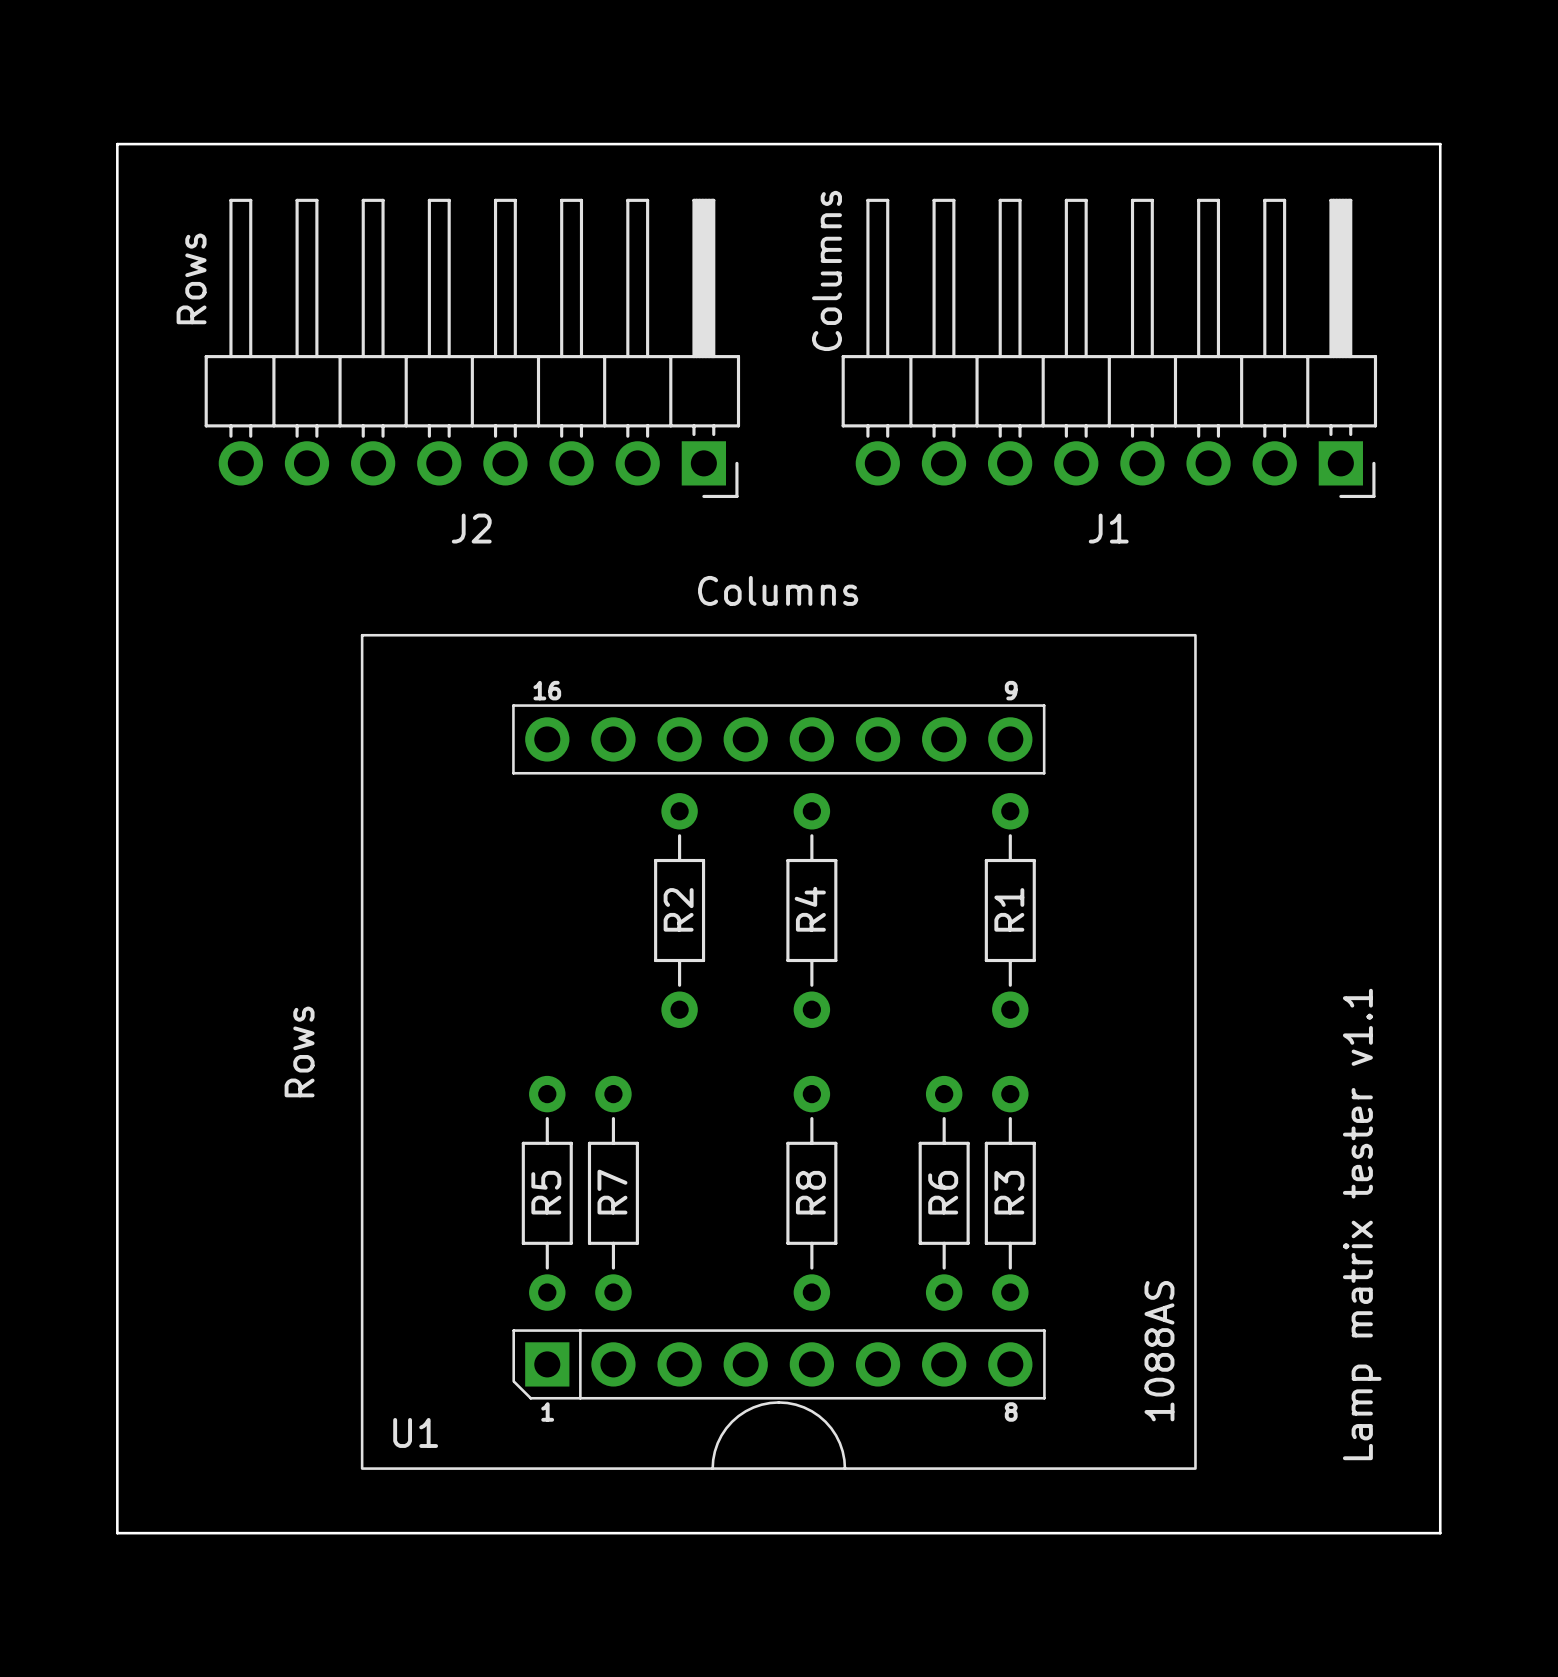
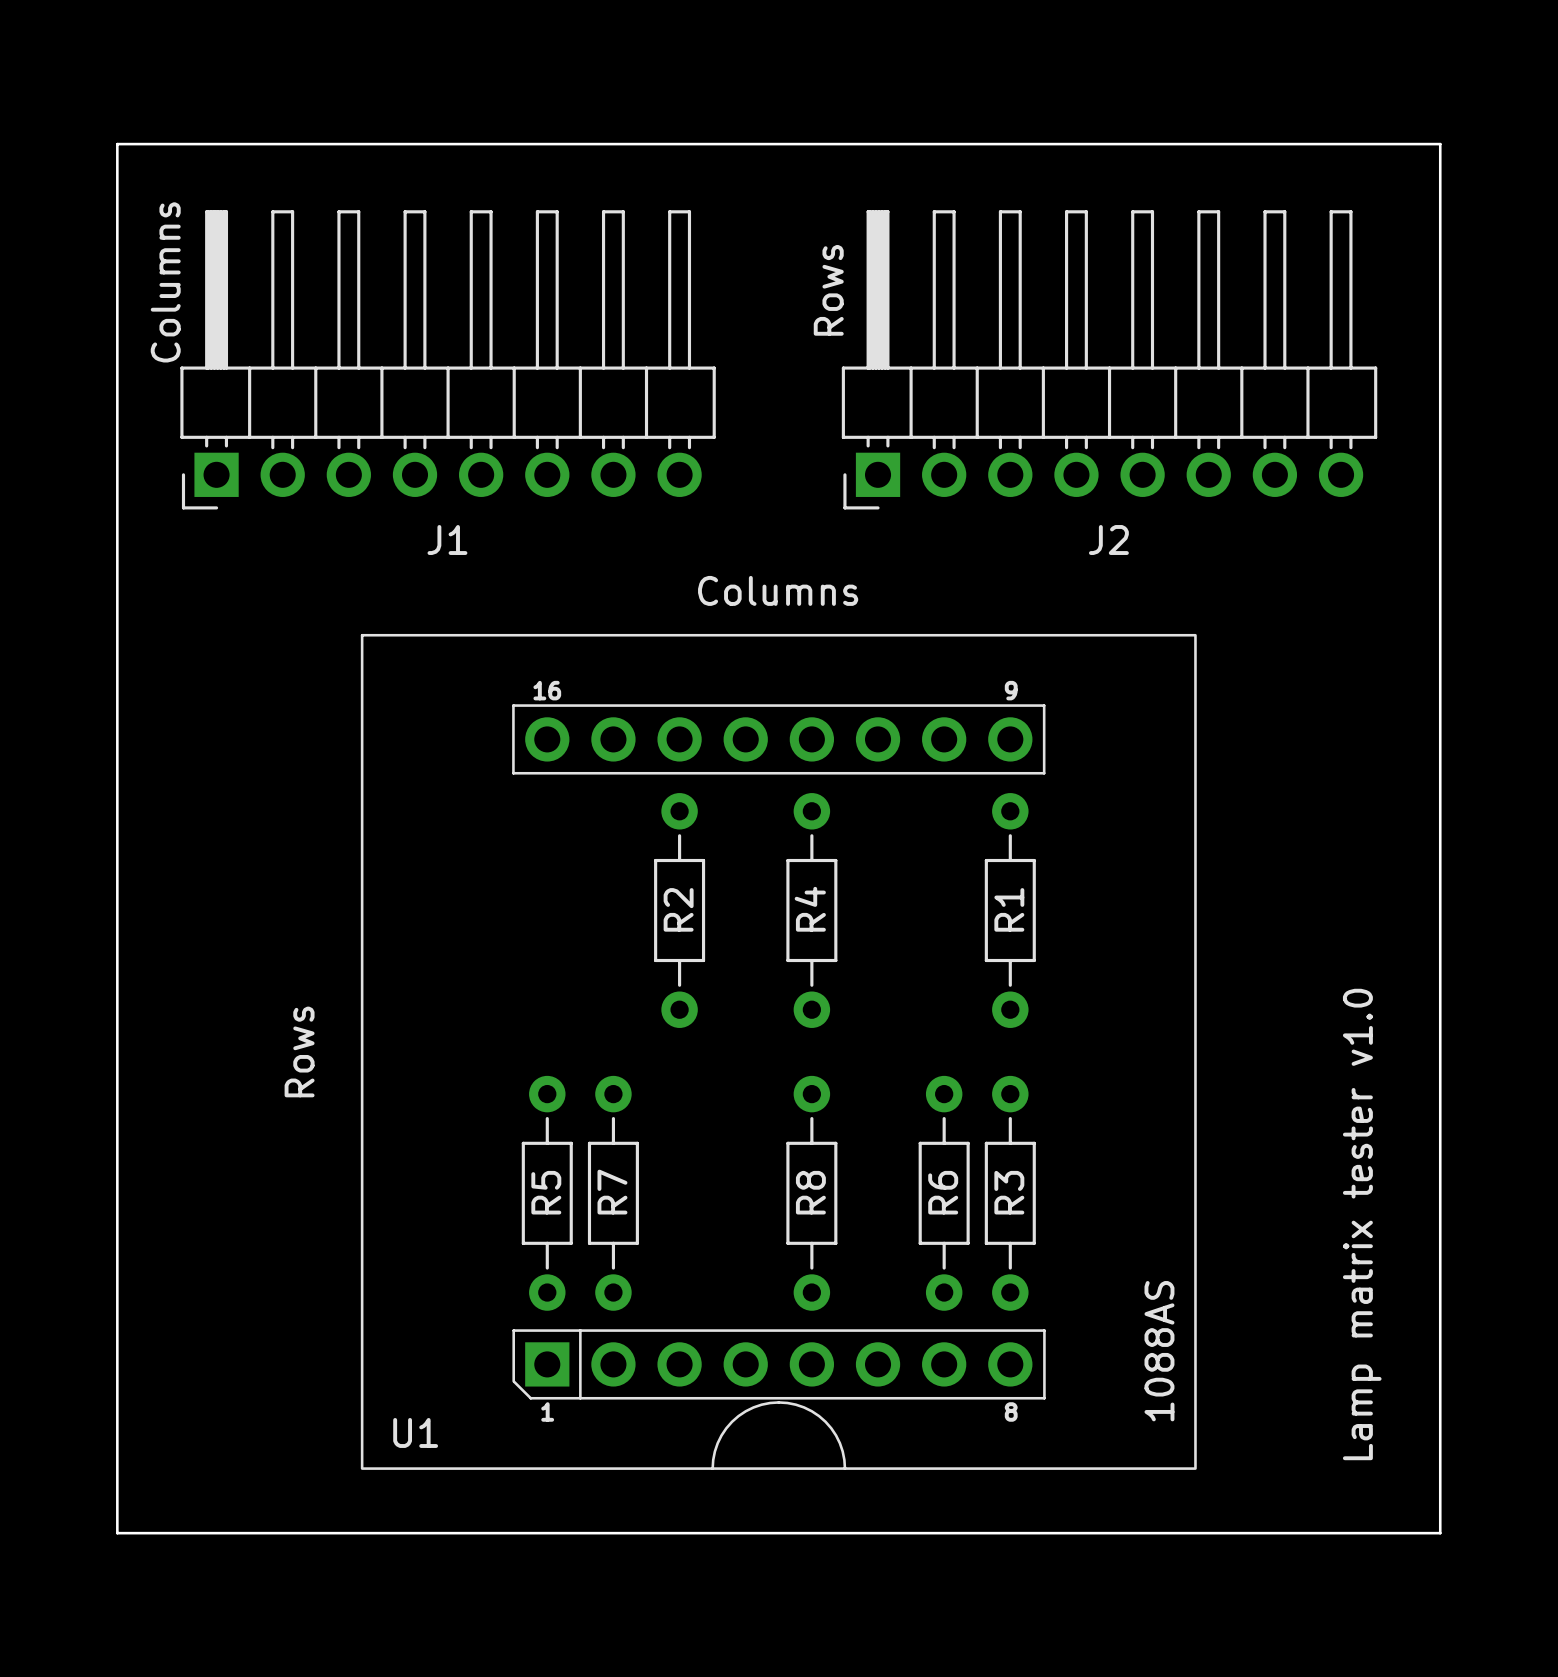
J2 footprint: [204, 198, 741, 499] -> [841, 210, 1378, 510]
J1 footprint: [841, 198, 1378, 499] -> [180, 210, 716, 510]
text: Columns (826, 270) -> Rows (828, 290)
text: Rows (191, 278) -> none
text: none -> Columns (165, 282)
text: Lamp matrix tester v1.1 (1362, 1224) -> Lamp matrix tester v1.0 (1362, 1224)

